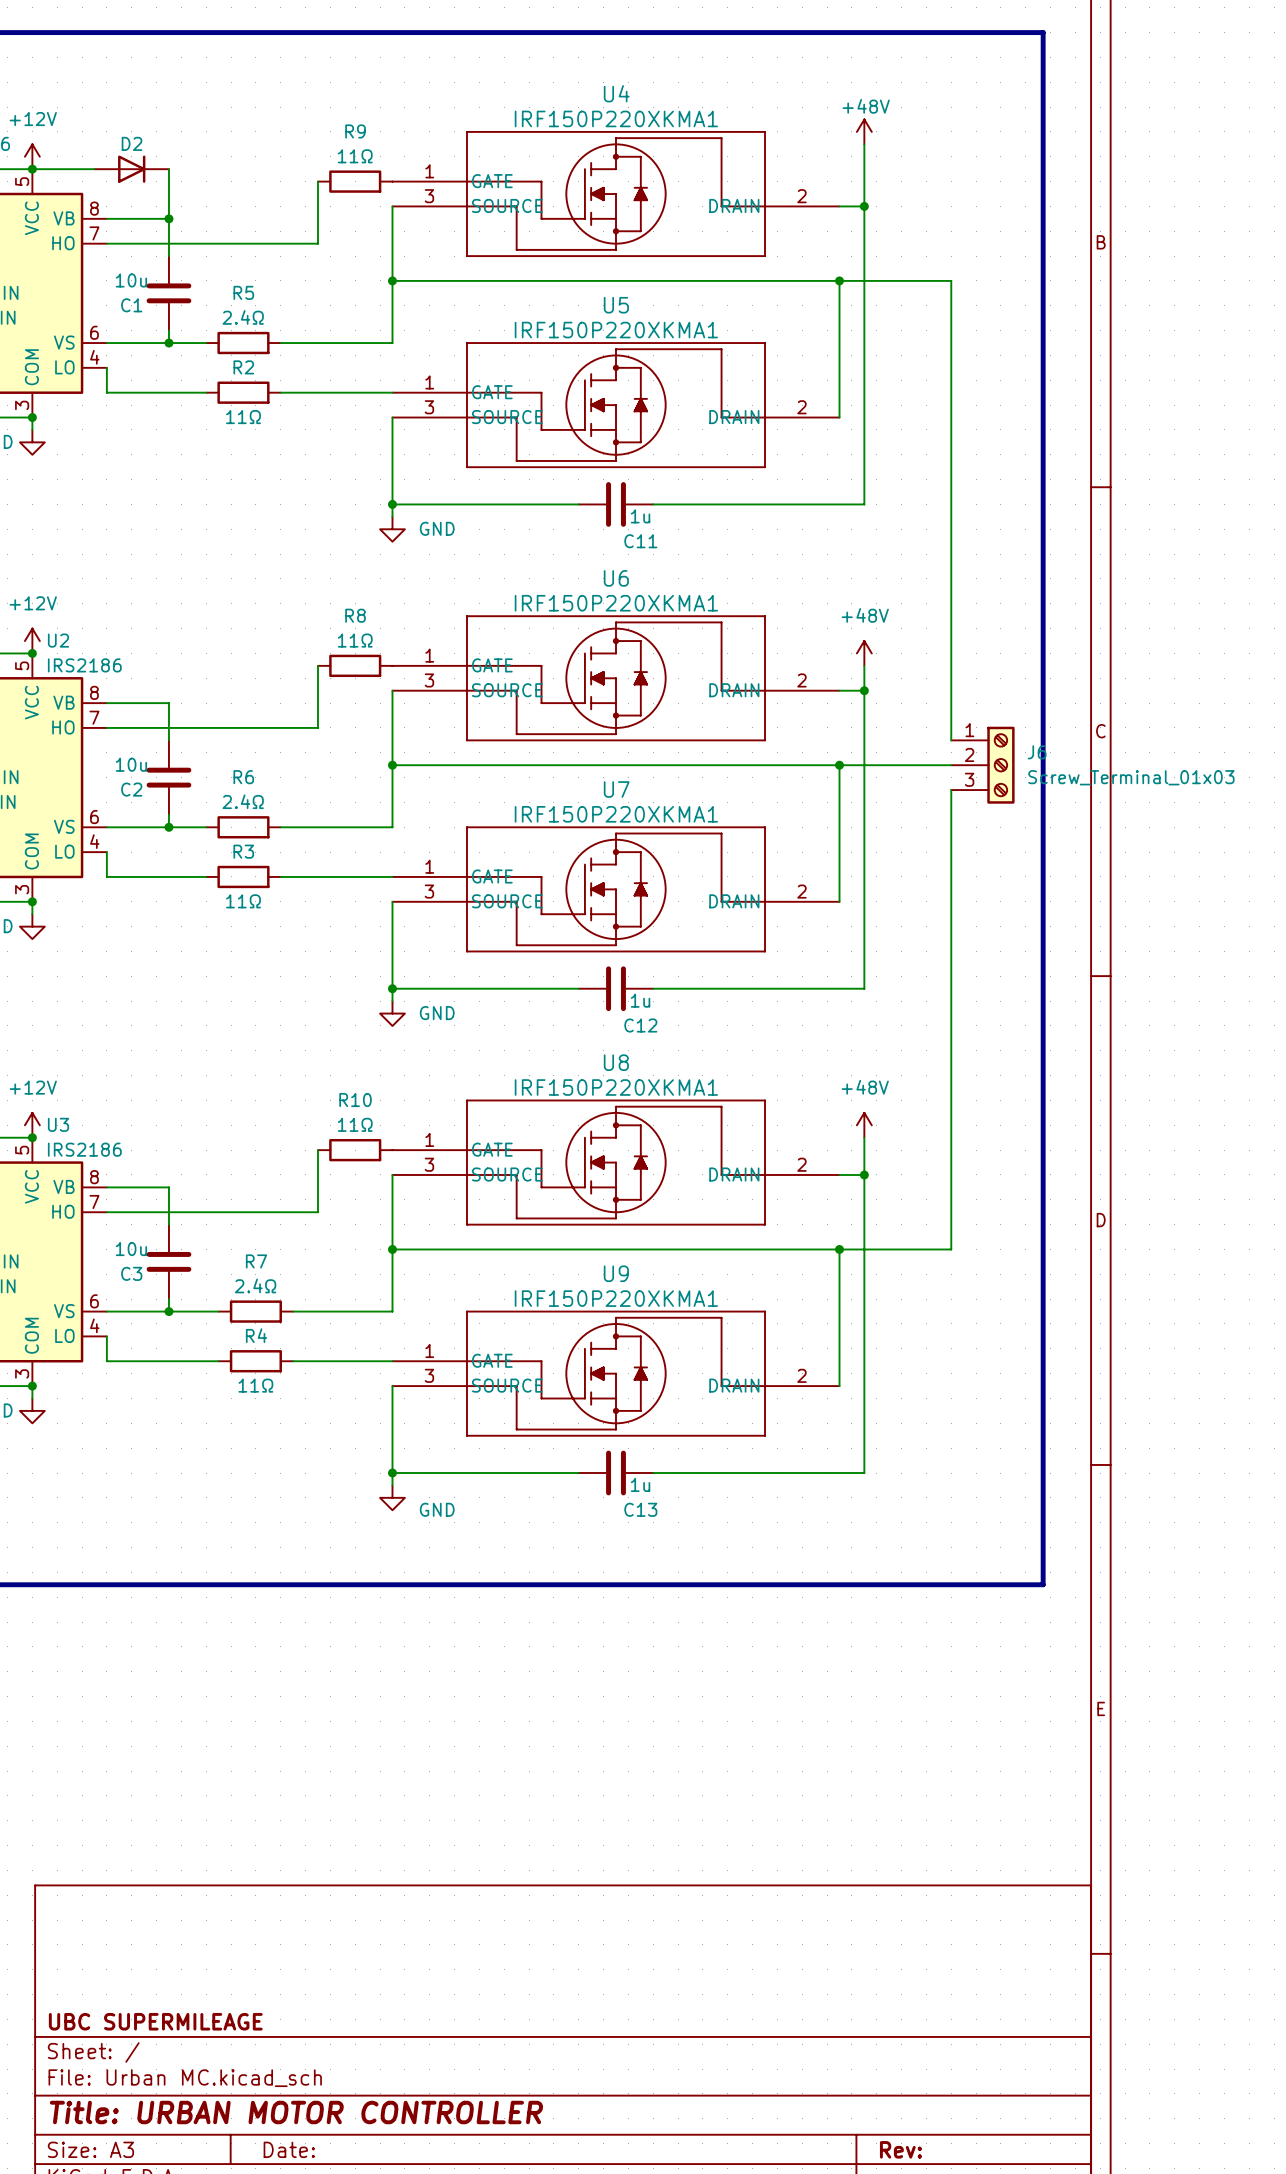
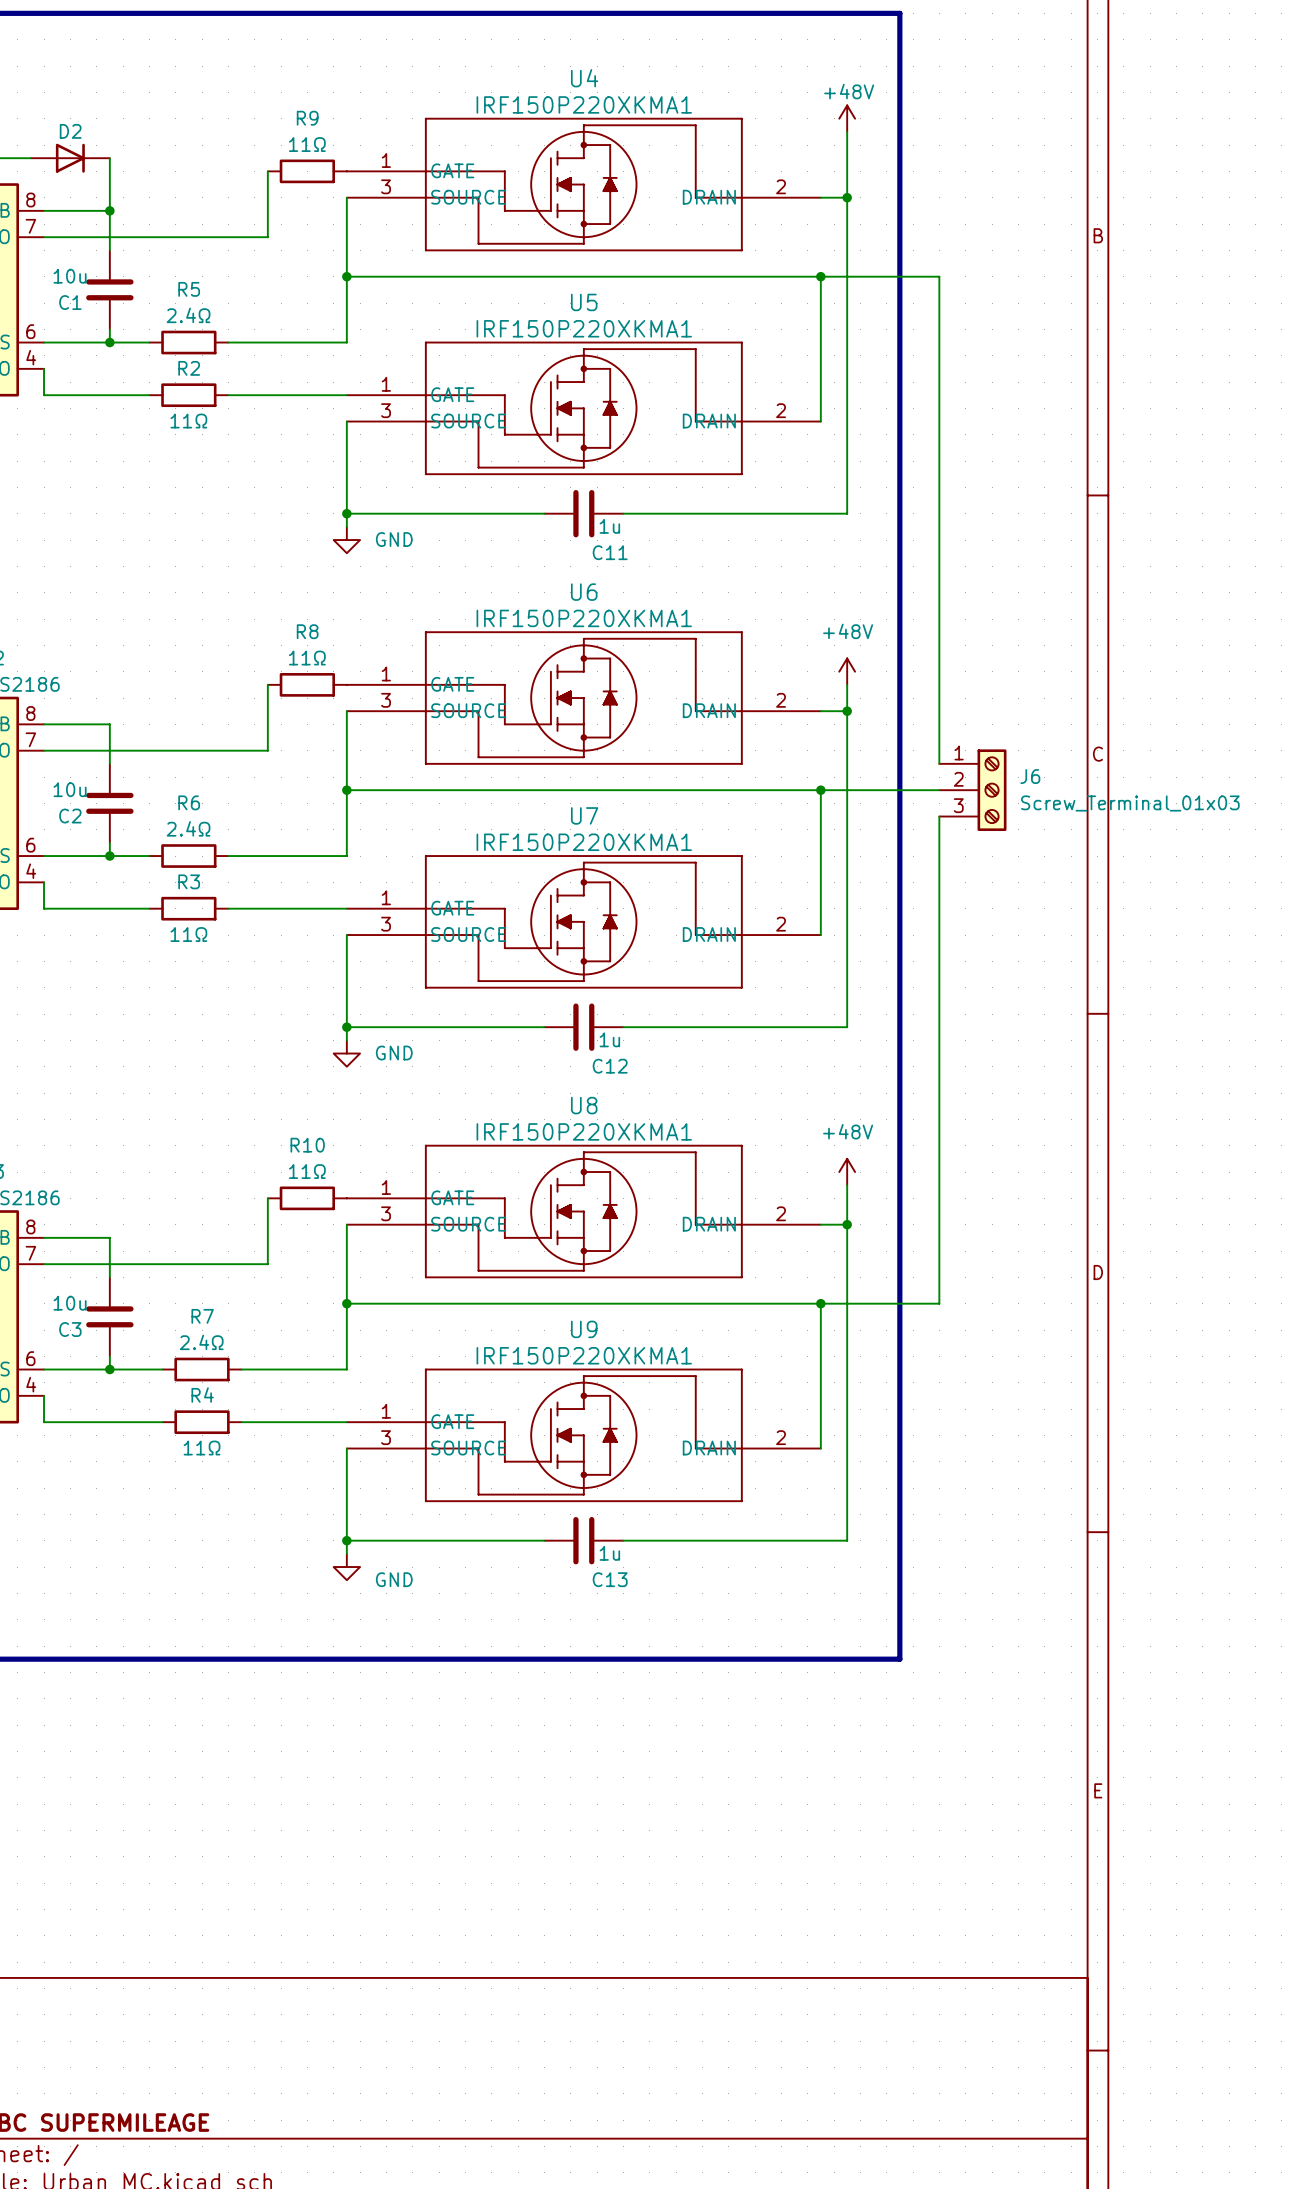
line: (914, 32) (1043, 32) (1043, 1584) (914, 1584) -> (899, 13) (899, 1659)

